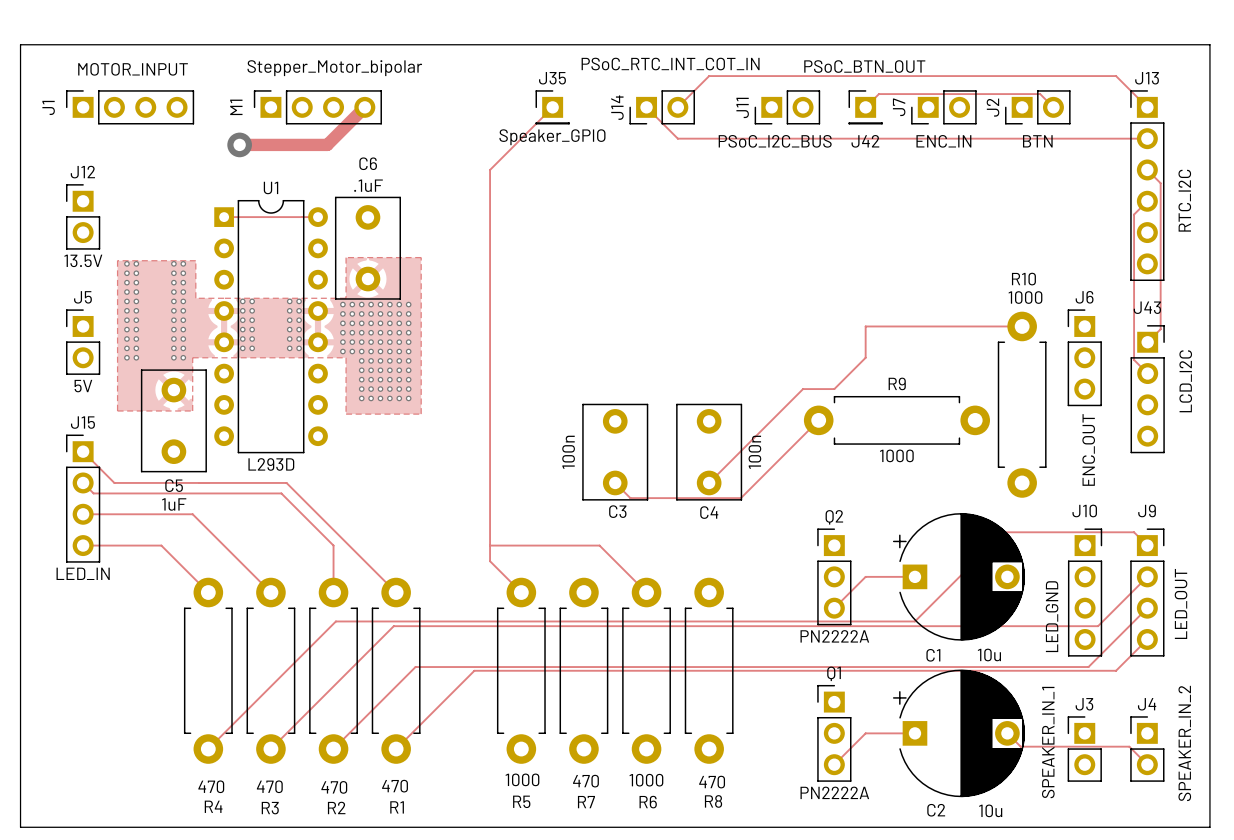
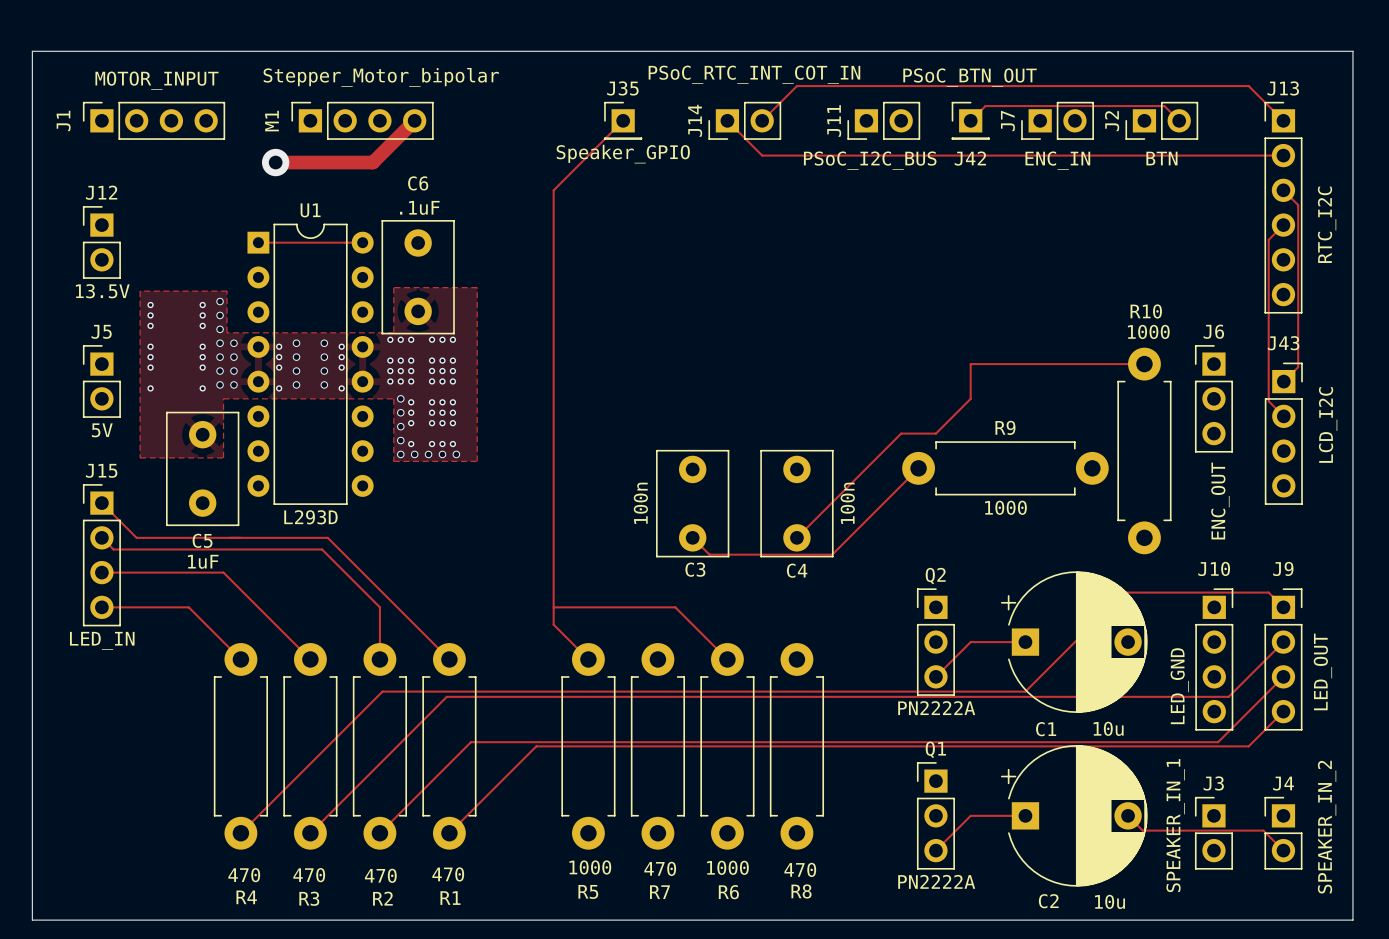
via: (126, 263) -> none
via: (136, 263) -> none
via: (173, 263) -> none
via: (183, 263) -> none
via: none -> (220, 301)
via: (136, 273) -> none
via: (183, 273) -> none
via: (136, 282) -> none
via: (183, 282) -> none
via: none -> (220, 315)
via: (136, 292) -> none
via: (183, 292) -> none
via: none -> (220, 329)
via: (126, 301) -> none
via: (136, 301) -> none
via: (173, 301) -> none
via: (183, 301) -> none
via: (242, 301) -> none
via: (252, 301) -> none
via: (289, 301) -> none
via: (299, 301) -> none
via: (371, 304) -> none
via: (408, 304) -> none
via: none -> (220, 343)
via: none -> (233, 343)
via: none -> (296, 343)
via: none -> (324, 343)
via: (136, 310) -> none
via: (183, 310) -> none
via: (252, 310) -> none
via: (289, 310) -> none
via: (342, 313) -> none
via: (352, 313) -> none
via: (361, 313) -> none
via: (371, 313) -> none
via: (380, 313) -> none
via: (389, 313) -> none
via: (399, 313) -> none
via: (408, 313) -> none
via: (136, 320) -> none
via: (183, 320) -> none
via: none -> (220, 357)
via: none -> (233, 357)
via: (252, 320) -> none
via: none -> (296, 357)
via: none -> (324, 357)
via: (289, 320) -> none
via: (371, 323) -> none
via: (408, 323) -> none
via: (136, 329) -> none
via: (183, 329) -> none
via: (252, 329) -> none
via: (289, 329) -> none
via: none -> (220, 371)
via: none -> (233, 371)
via: none -> (296, 371)
via: none -> (324, 371)
via: (371, 332) -> none
via: (408, 332) -> none
via: (126, 338) -> none
via: (136, 338) -> none
via: (173, 338) -> none
via: (183, 338) -> none
via: (242, 338) -> none
via: (252, 338) -> none
via: (289, 338) -> none
via: (299, 338) -> none
via: (371, 342) -> none
via: (408, 342) -> none
via: none -> (220, 384)
via: none -> (233, 384)
via: none -> (296, 384)
via: none -> (324, 384)
via: (136, 348) -> none
via: (183, 348) -> none
via: (252, 348) -> none
via: (289, 348) -> none
via: (342, 351) -> none
via: (352, 351) -> none
via: (361, 351) -> none
via: (371, 351) -> none
via: (380, 351) -> none
via: (389, 351) -> none
via: (399, 351) -> none
via: (408, 351) -> none
via: (126, 357) -> none
via: (136, 357) -> none
via: (173, 357) -> none
via: (183, 357) -> none
via: none -> (400, 398)
via: (371, 360) -> none
via: (408, 360) -> none
via: none -> (400, 412)
via: (371, 370) -> none
via: (408, 370) -> none
via: (371, 379) -> none
via: (408, 379) -> none
via: none -> (400, 426)
via: (361, 389) -> none
via: (371, 389) -> none
via: (380, 389) -> none
via: (389, 389) -> none
via: (399, 389) -> none
via: (408, 389) -> none
via: none -> (400, 440)
via: (371, 398) -> none
via: (408, 398) -> none
via: none -> (400, 454)
via: none -> (414, 454)
via: none -> (428, 454)
via: none -> (442, 454)
via: none -> (456, 454)

